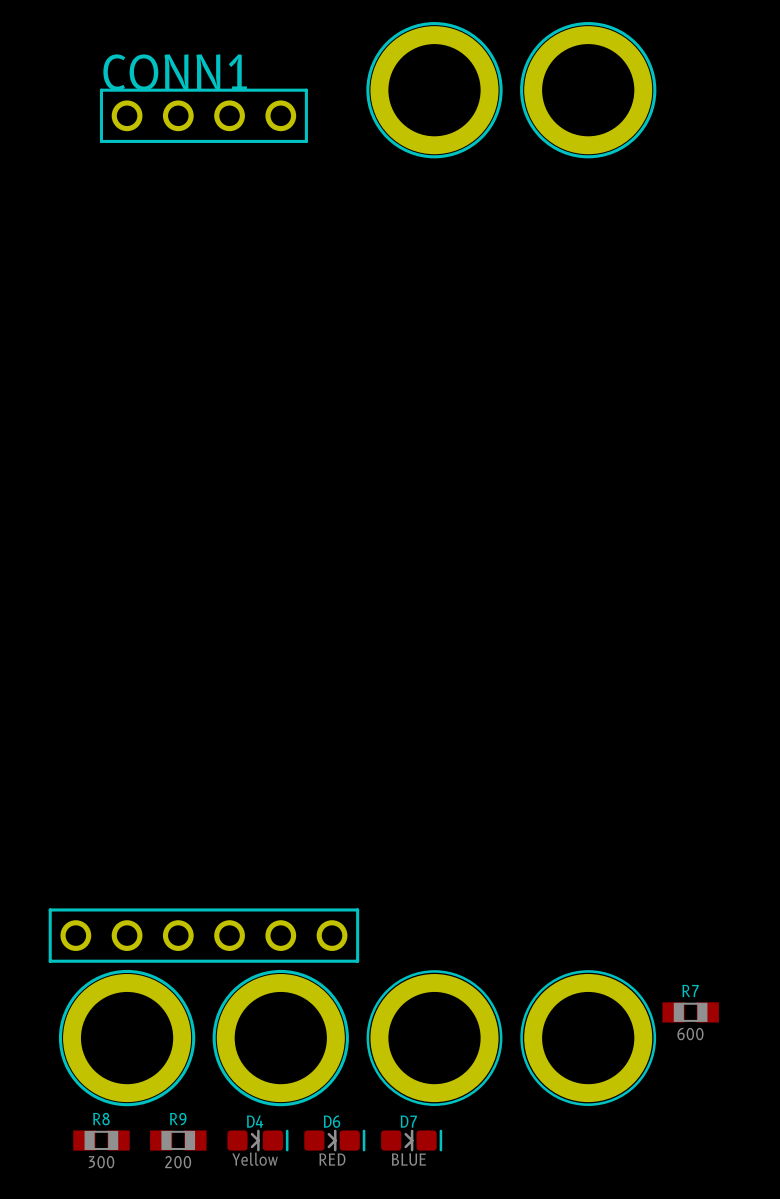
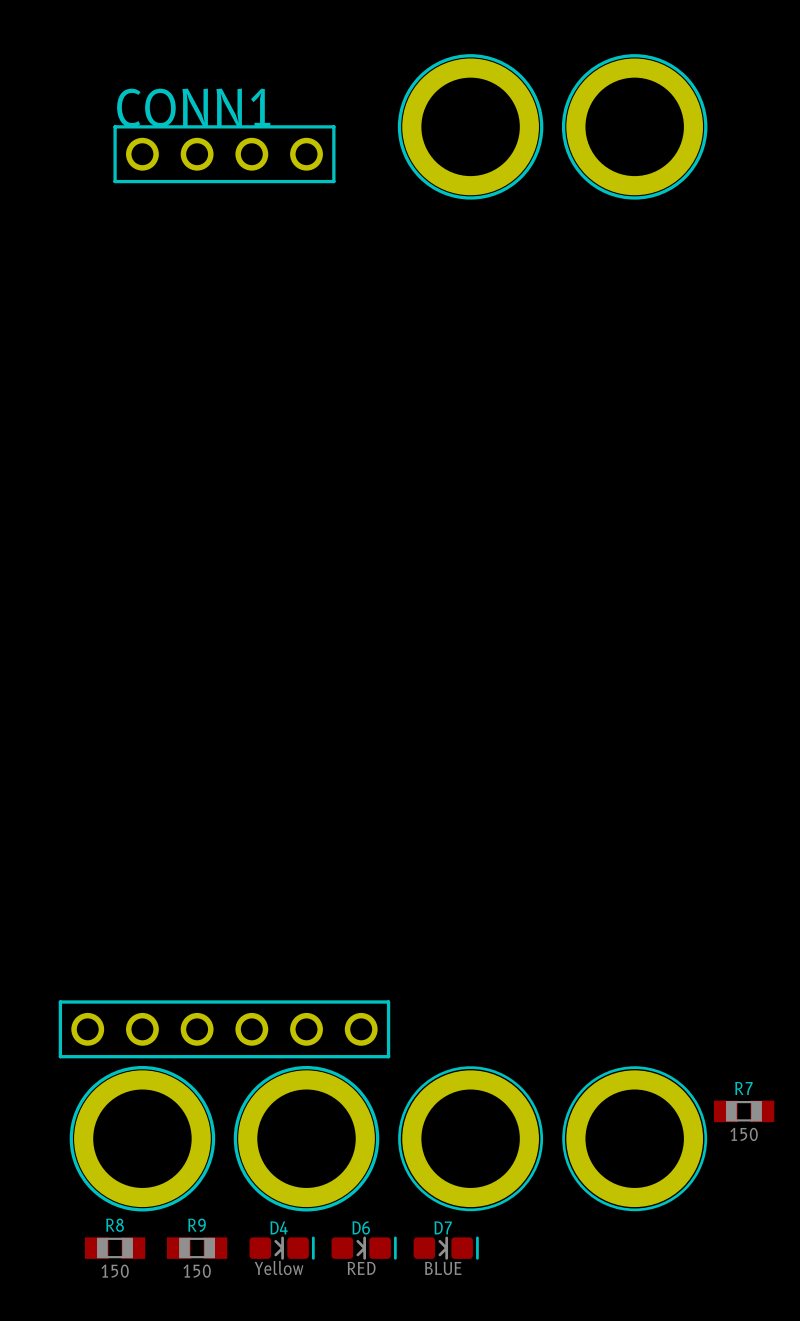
R7 value: 600 (690, 1034) -> 150 (744, 1134)
R8 value: 300 (101, 1162) -> 150 (115, 1271)
R9 value: 200 (178, 1162) -> 150 (197, 1271)

